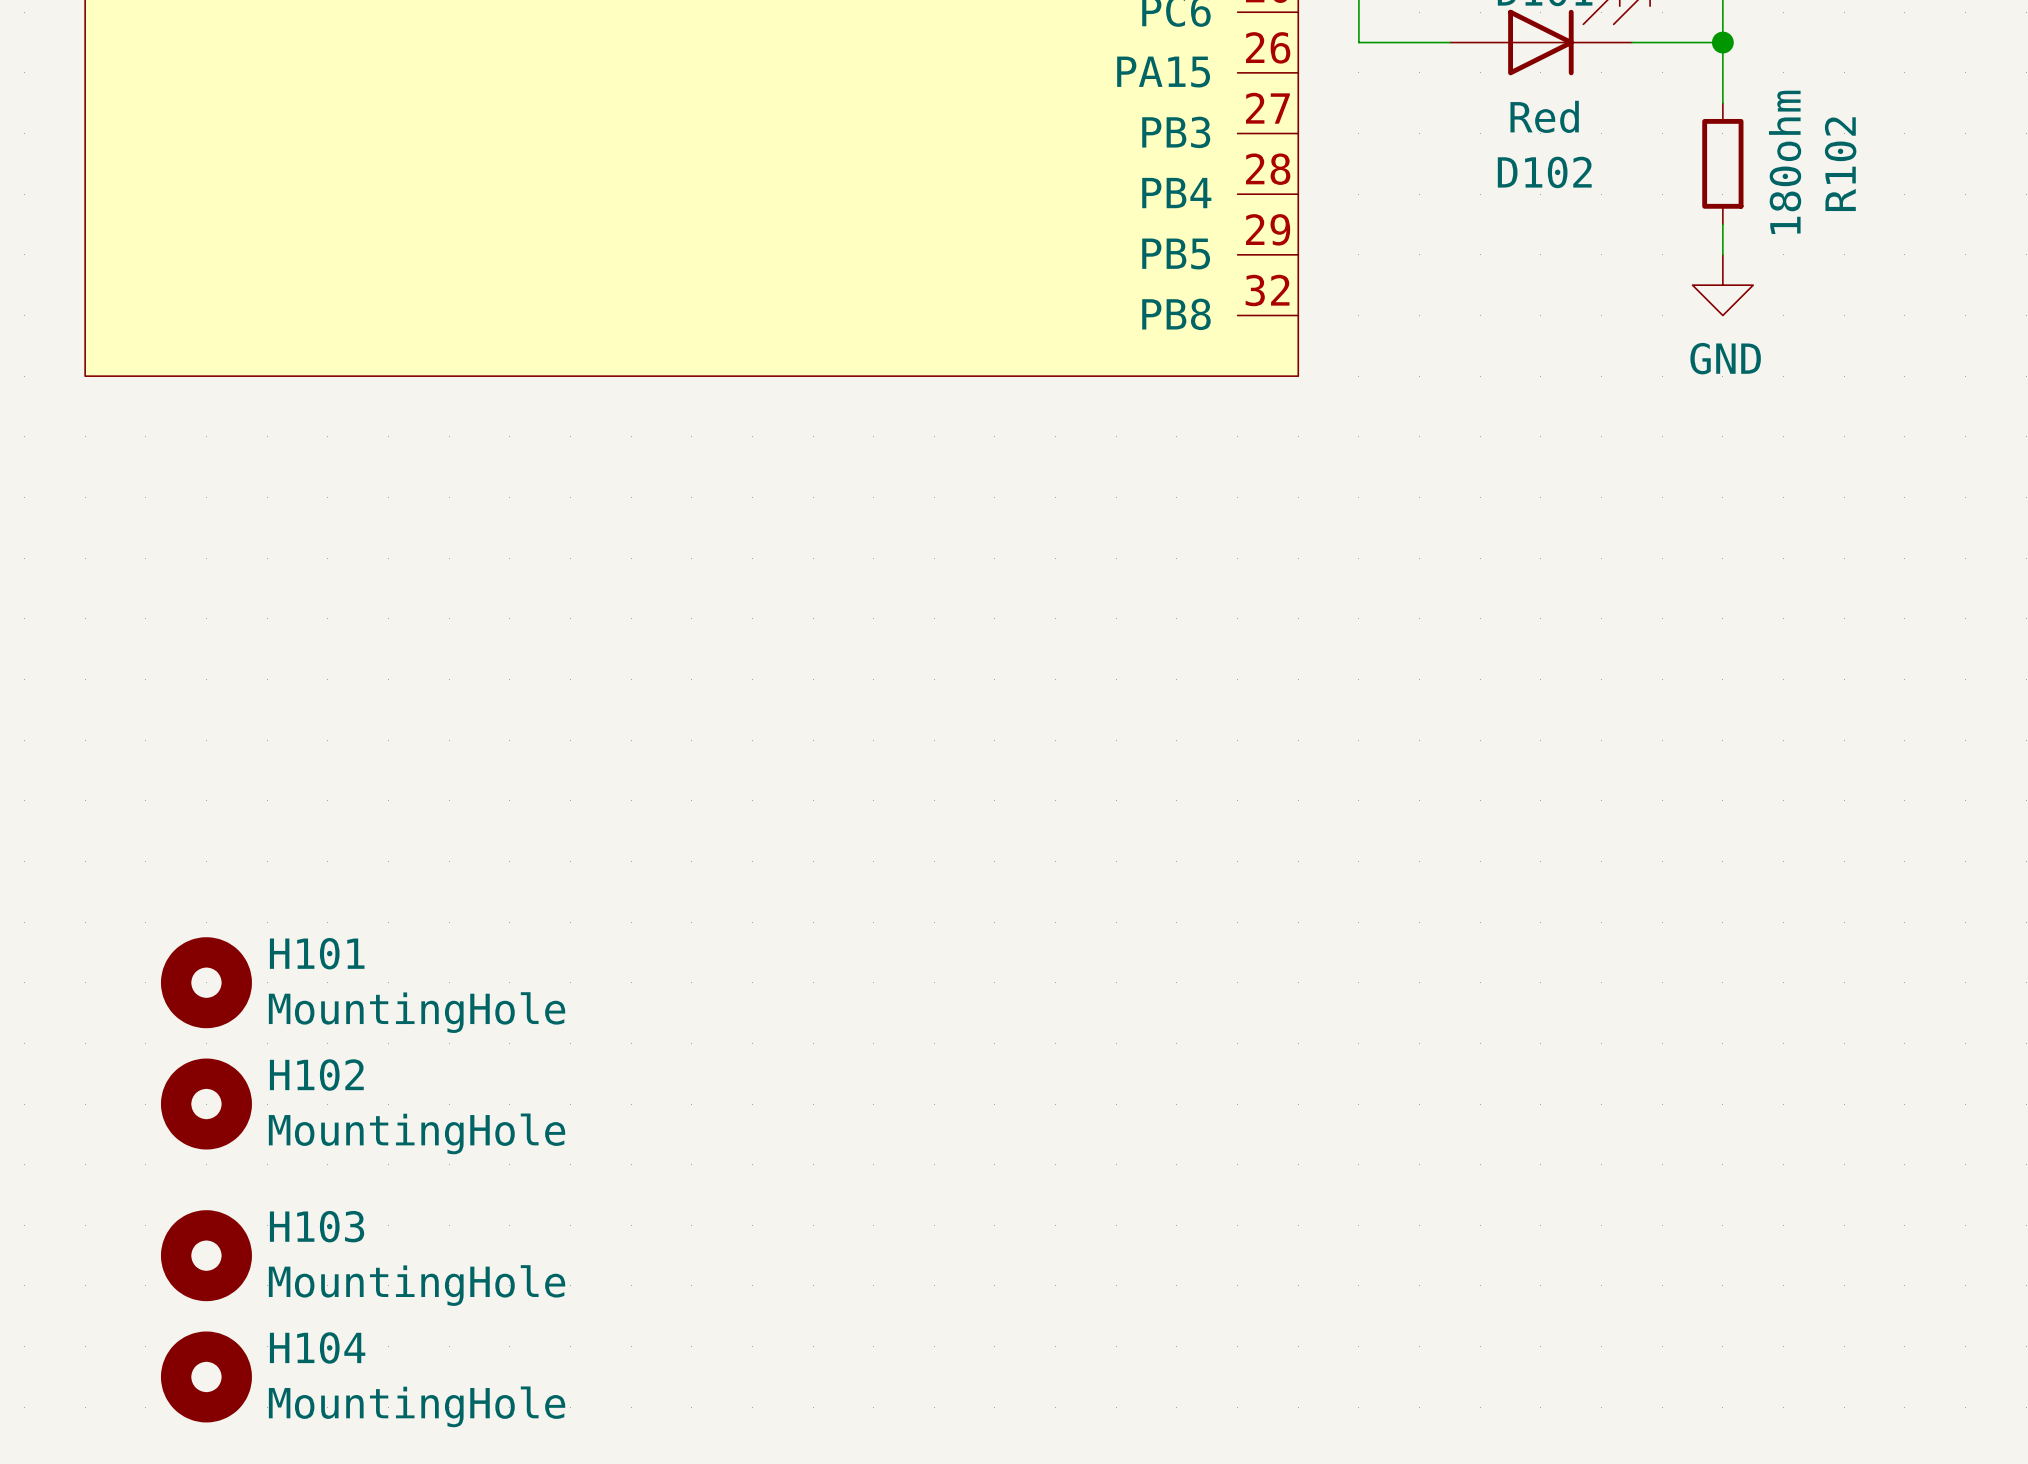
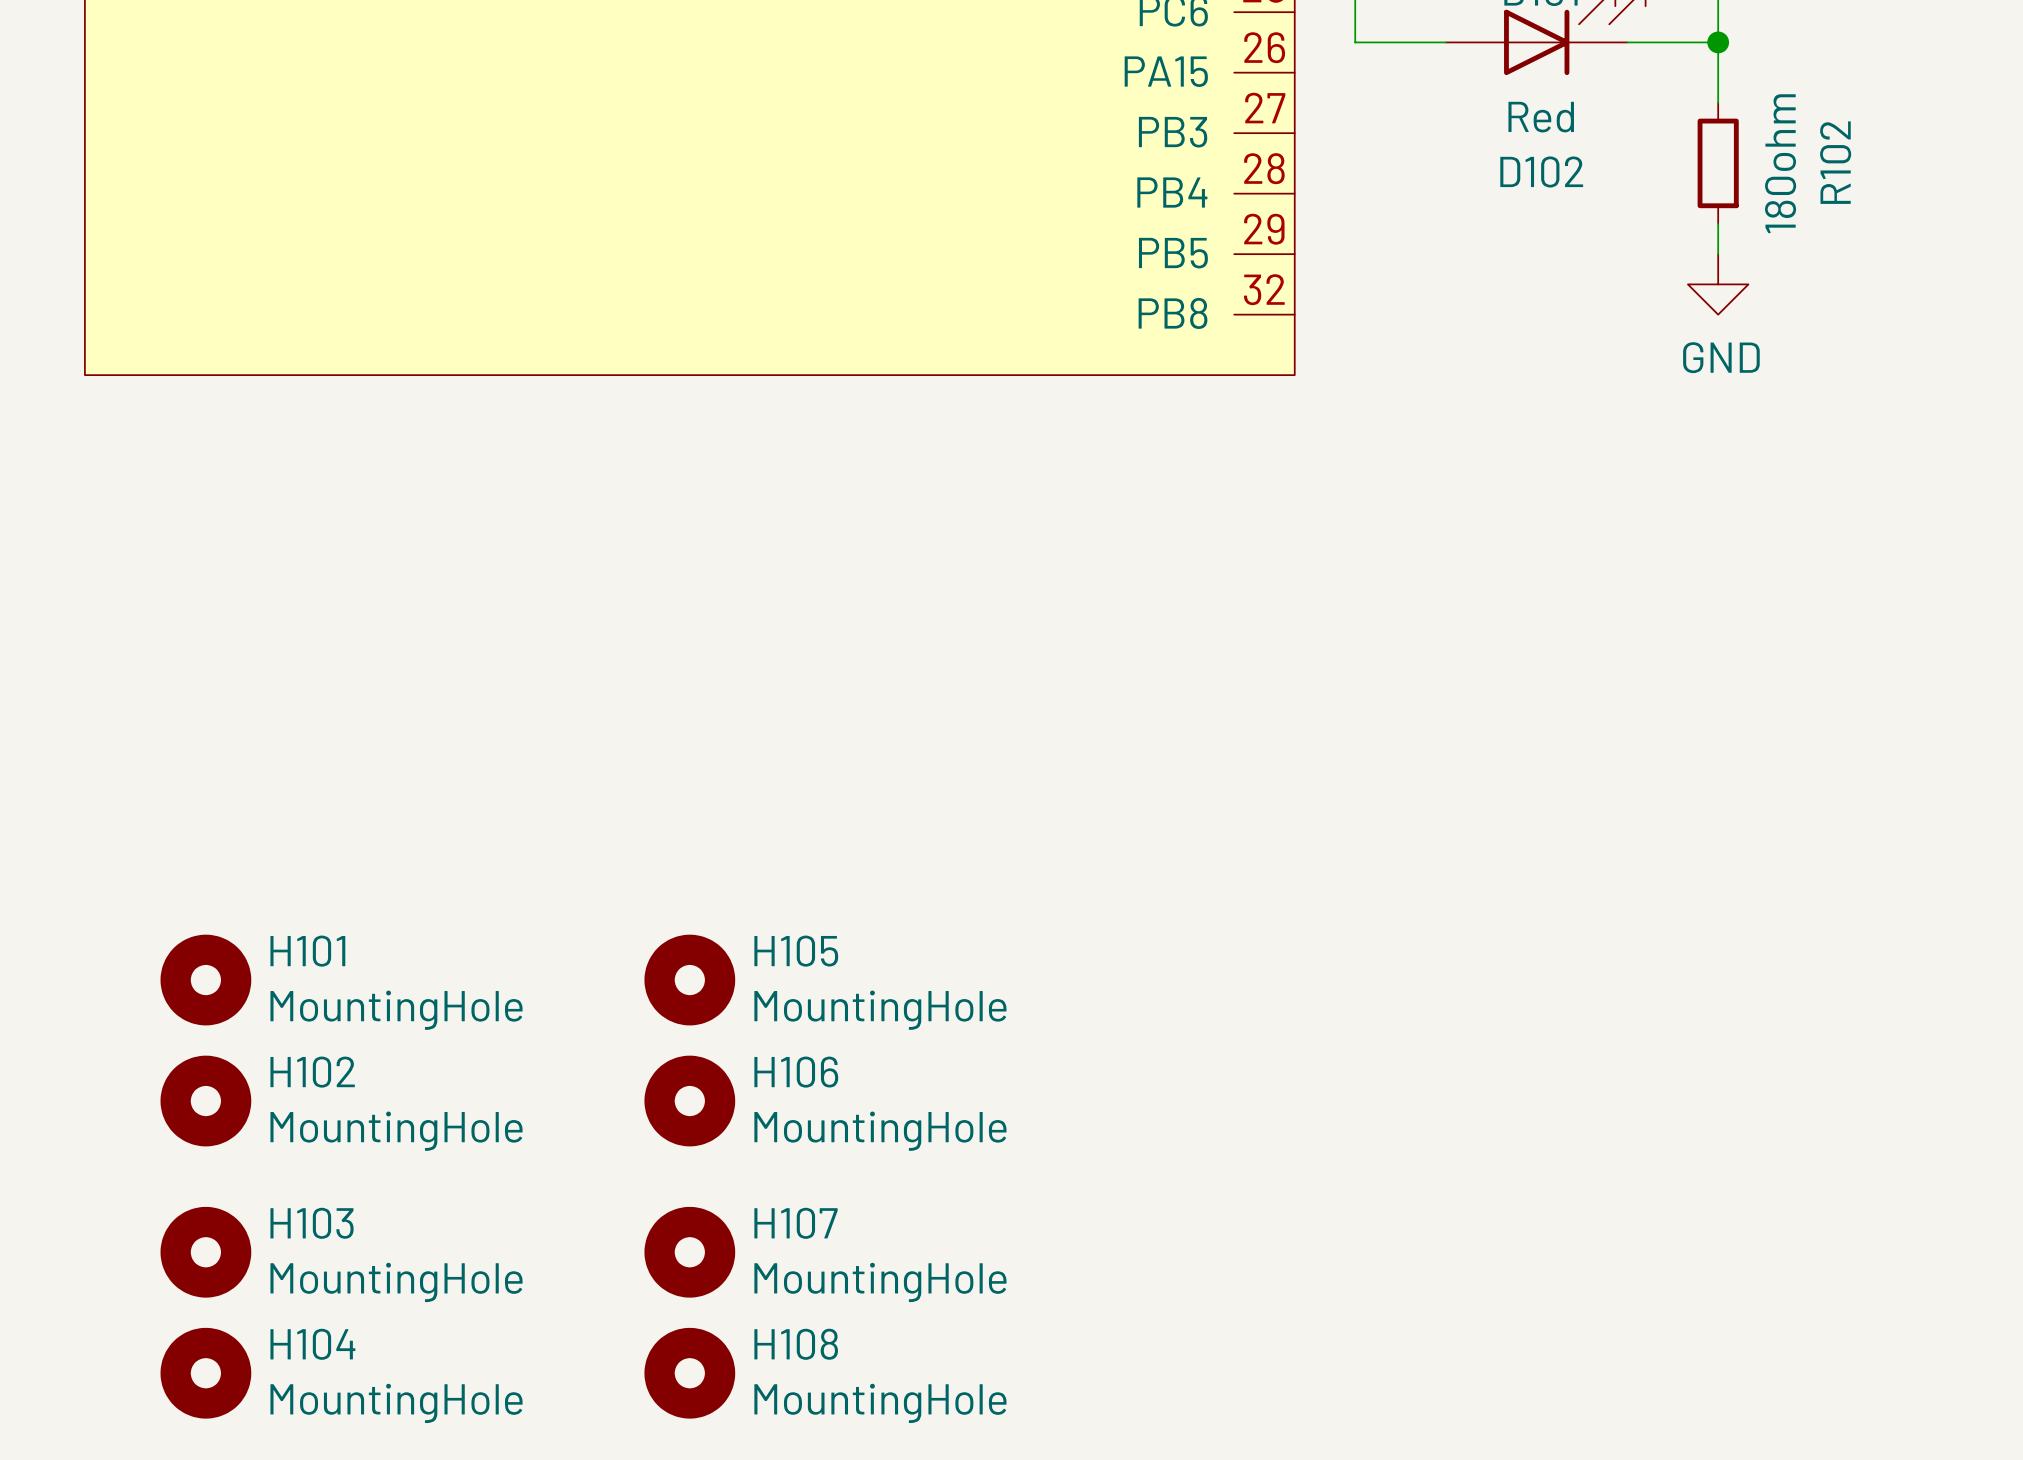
H105: none -> MountingHole (689, 980)
H106: none -> MountingHole (689, 1101)
H107: none -> MountingHole (689, 1252)
H108: none -> MountingHole (689, 1373)

